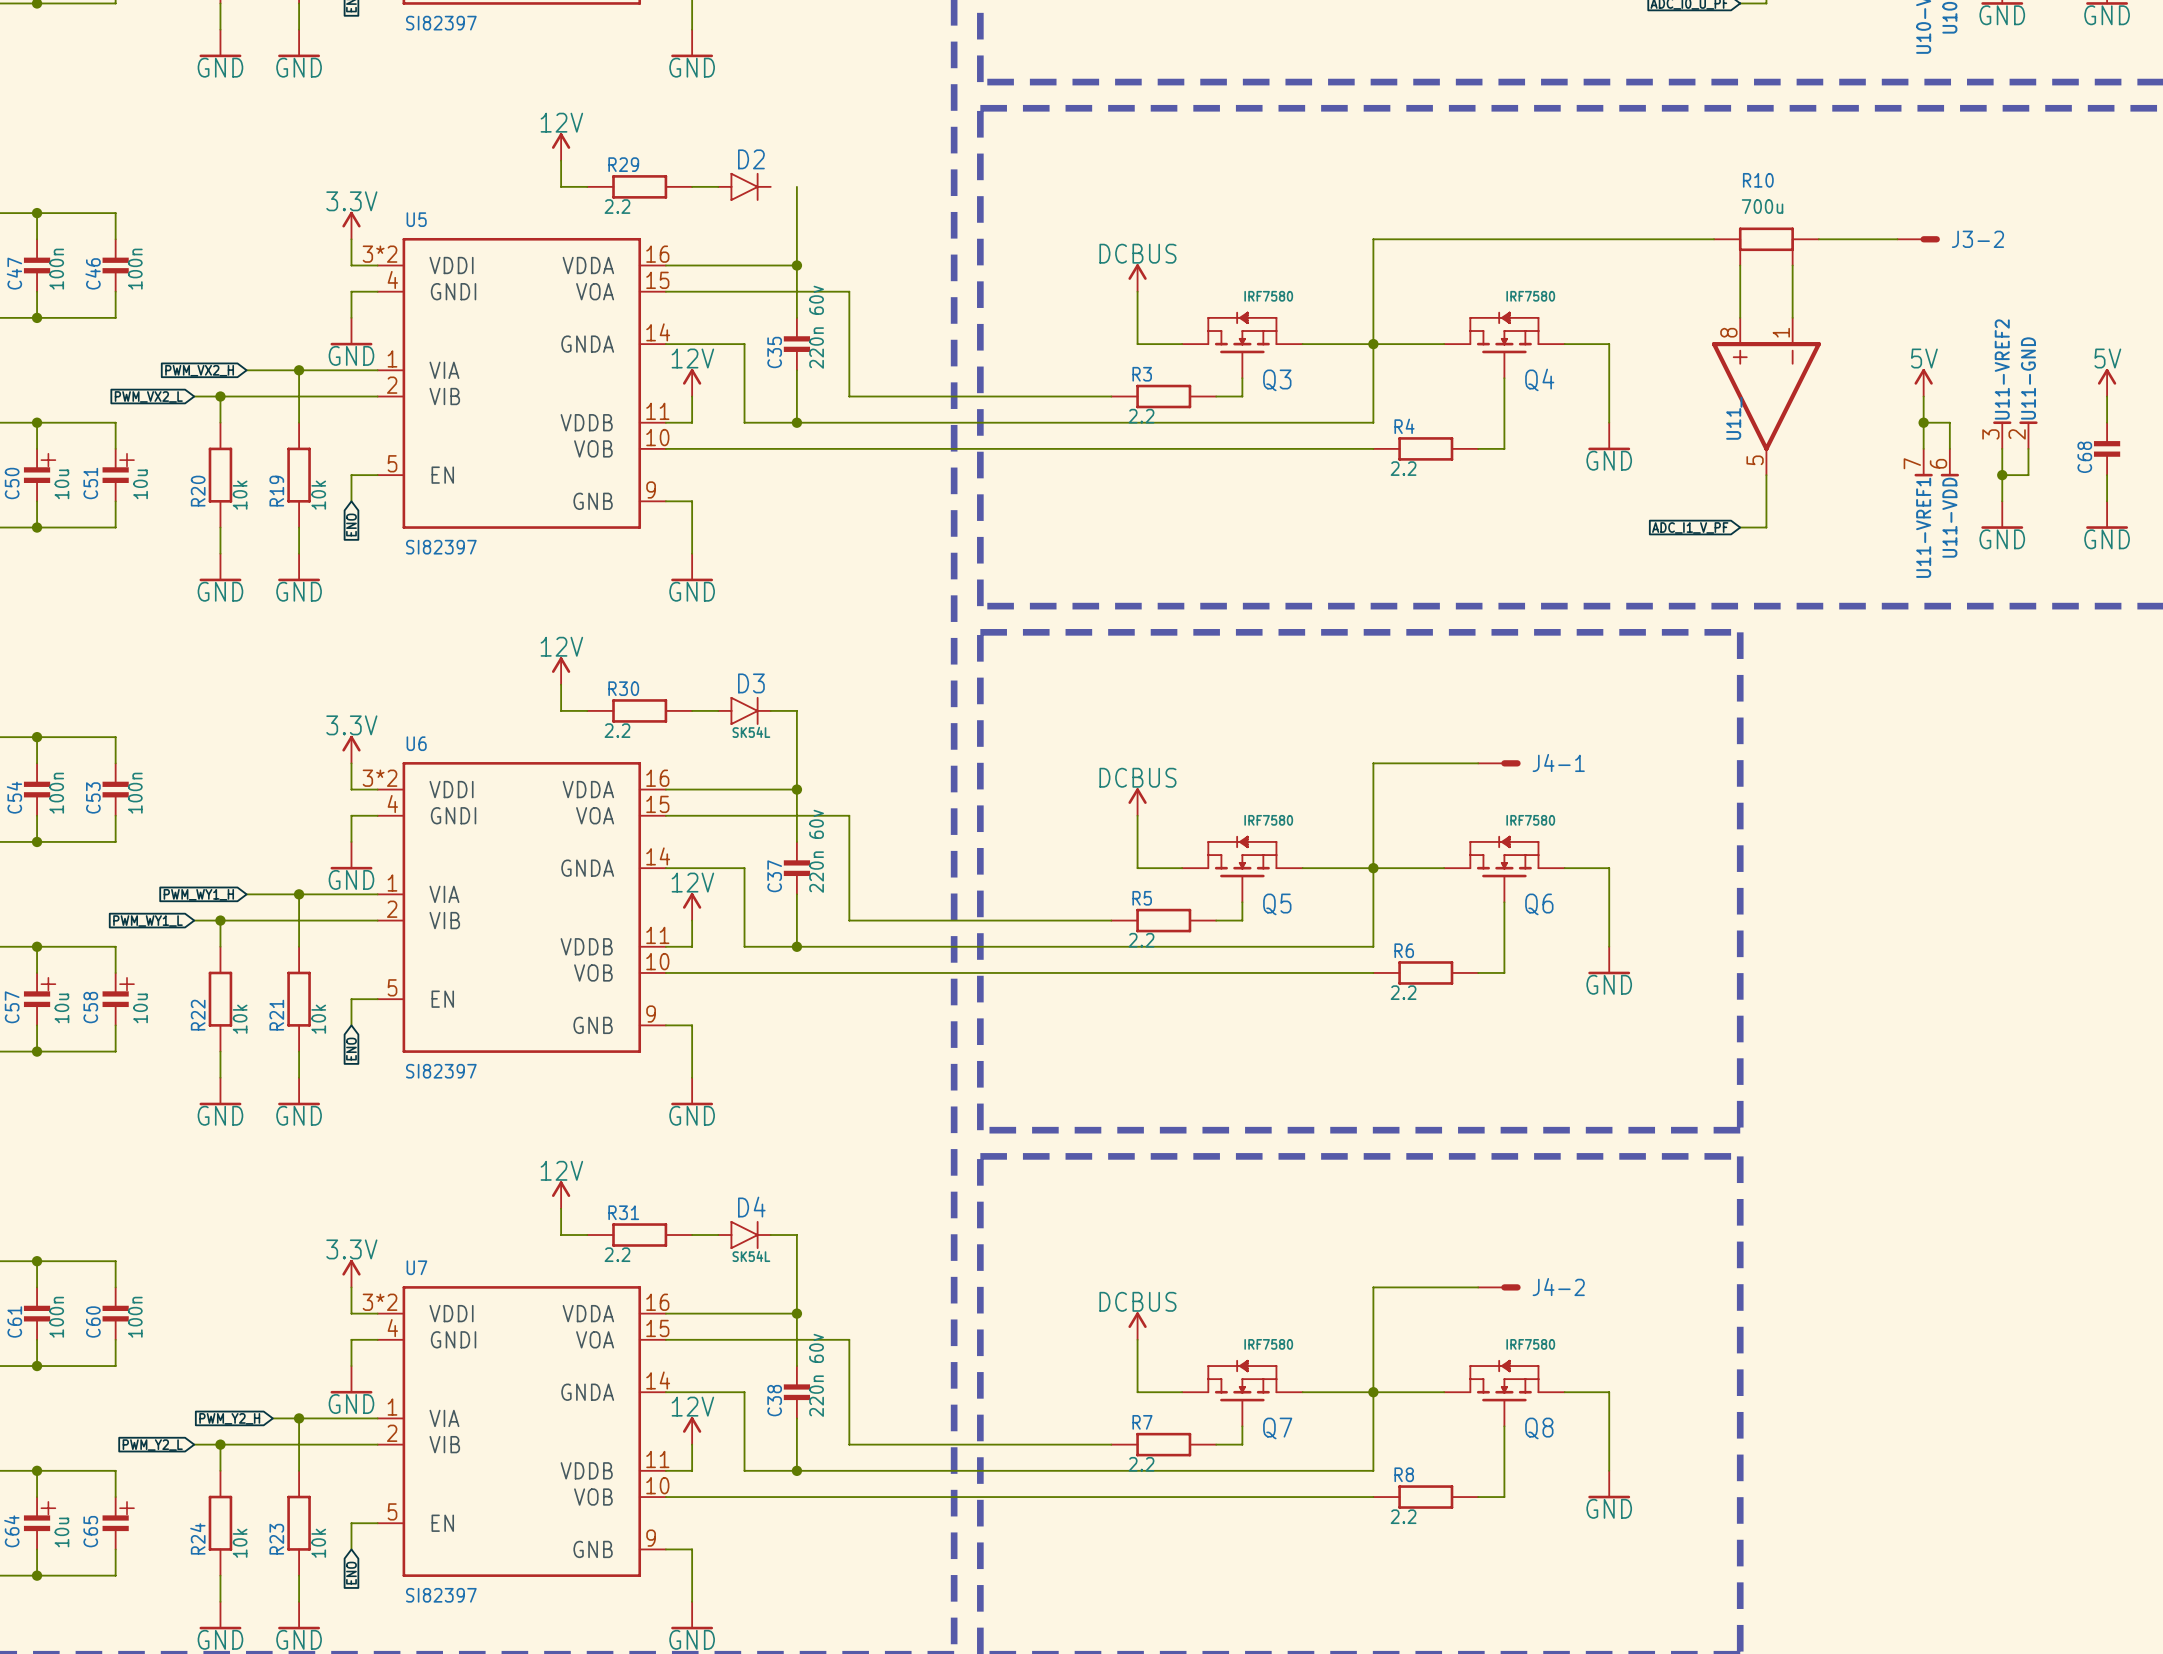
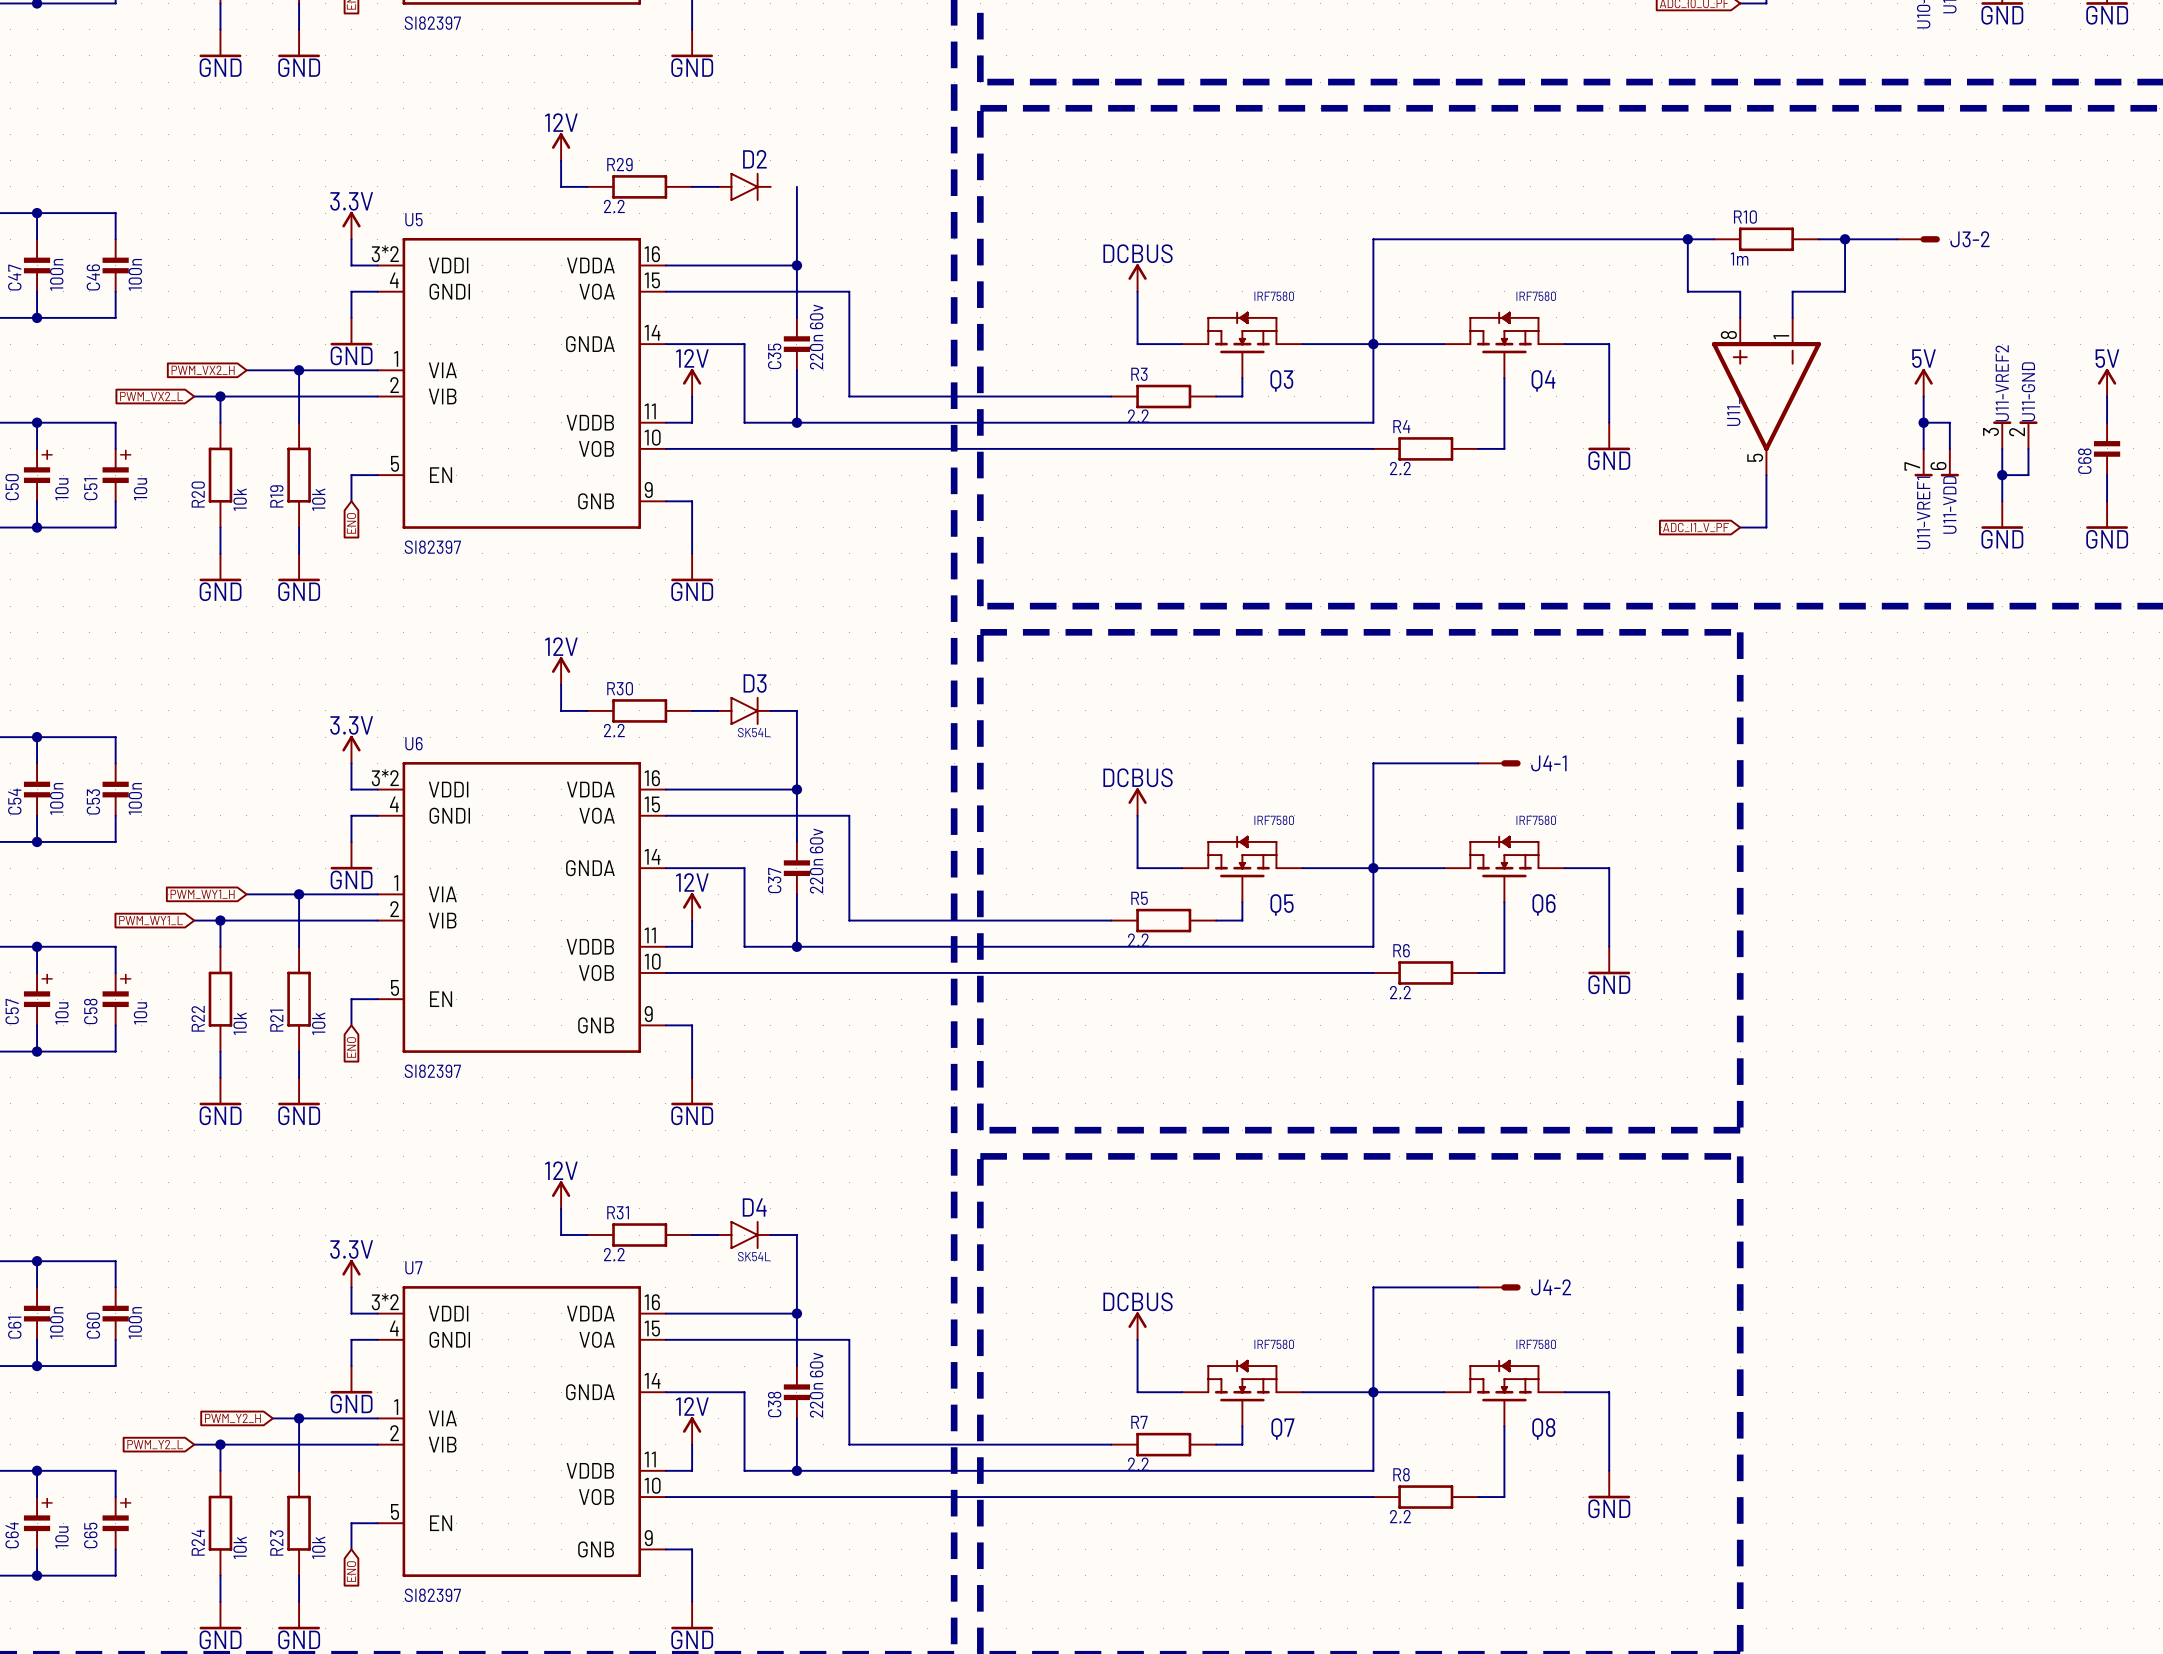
R10 name position: R10 (1758, 180) -> R10 (1745, 217)
R10 value: 700u (1762, 206) -> 1m (1739, 258)
R10 symbol: [1714, 227, 1819, 266] -> [1714, 227, 1819, 252]
junction: none -> (1687, 239)
junction: none -> (1845, 239)
wire: (1740, 265) (1740, 291) -> (1687, 239) (1687, 291) (1740, 291)
wire: (1792, 265) (1792, 291) -> (1845, 239) (1845, 291) (1792, 291)

